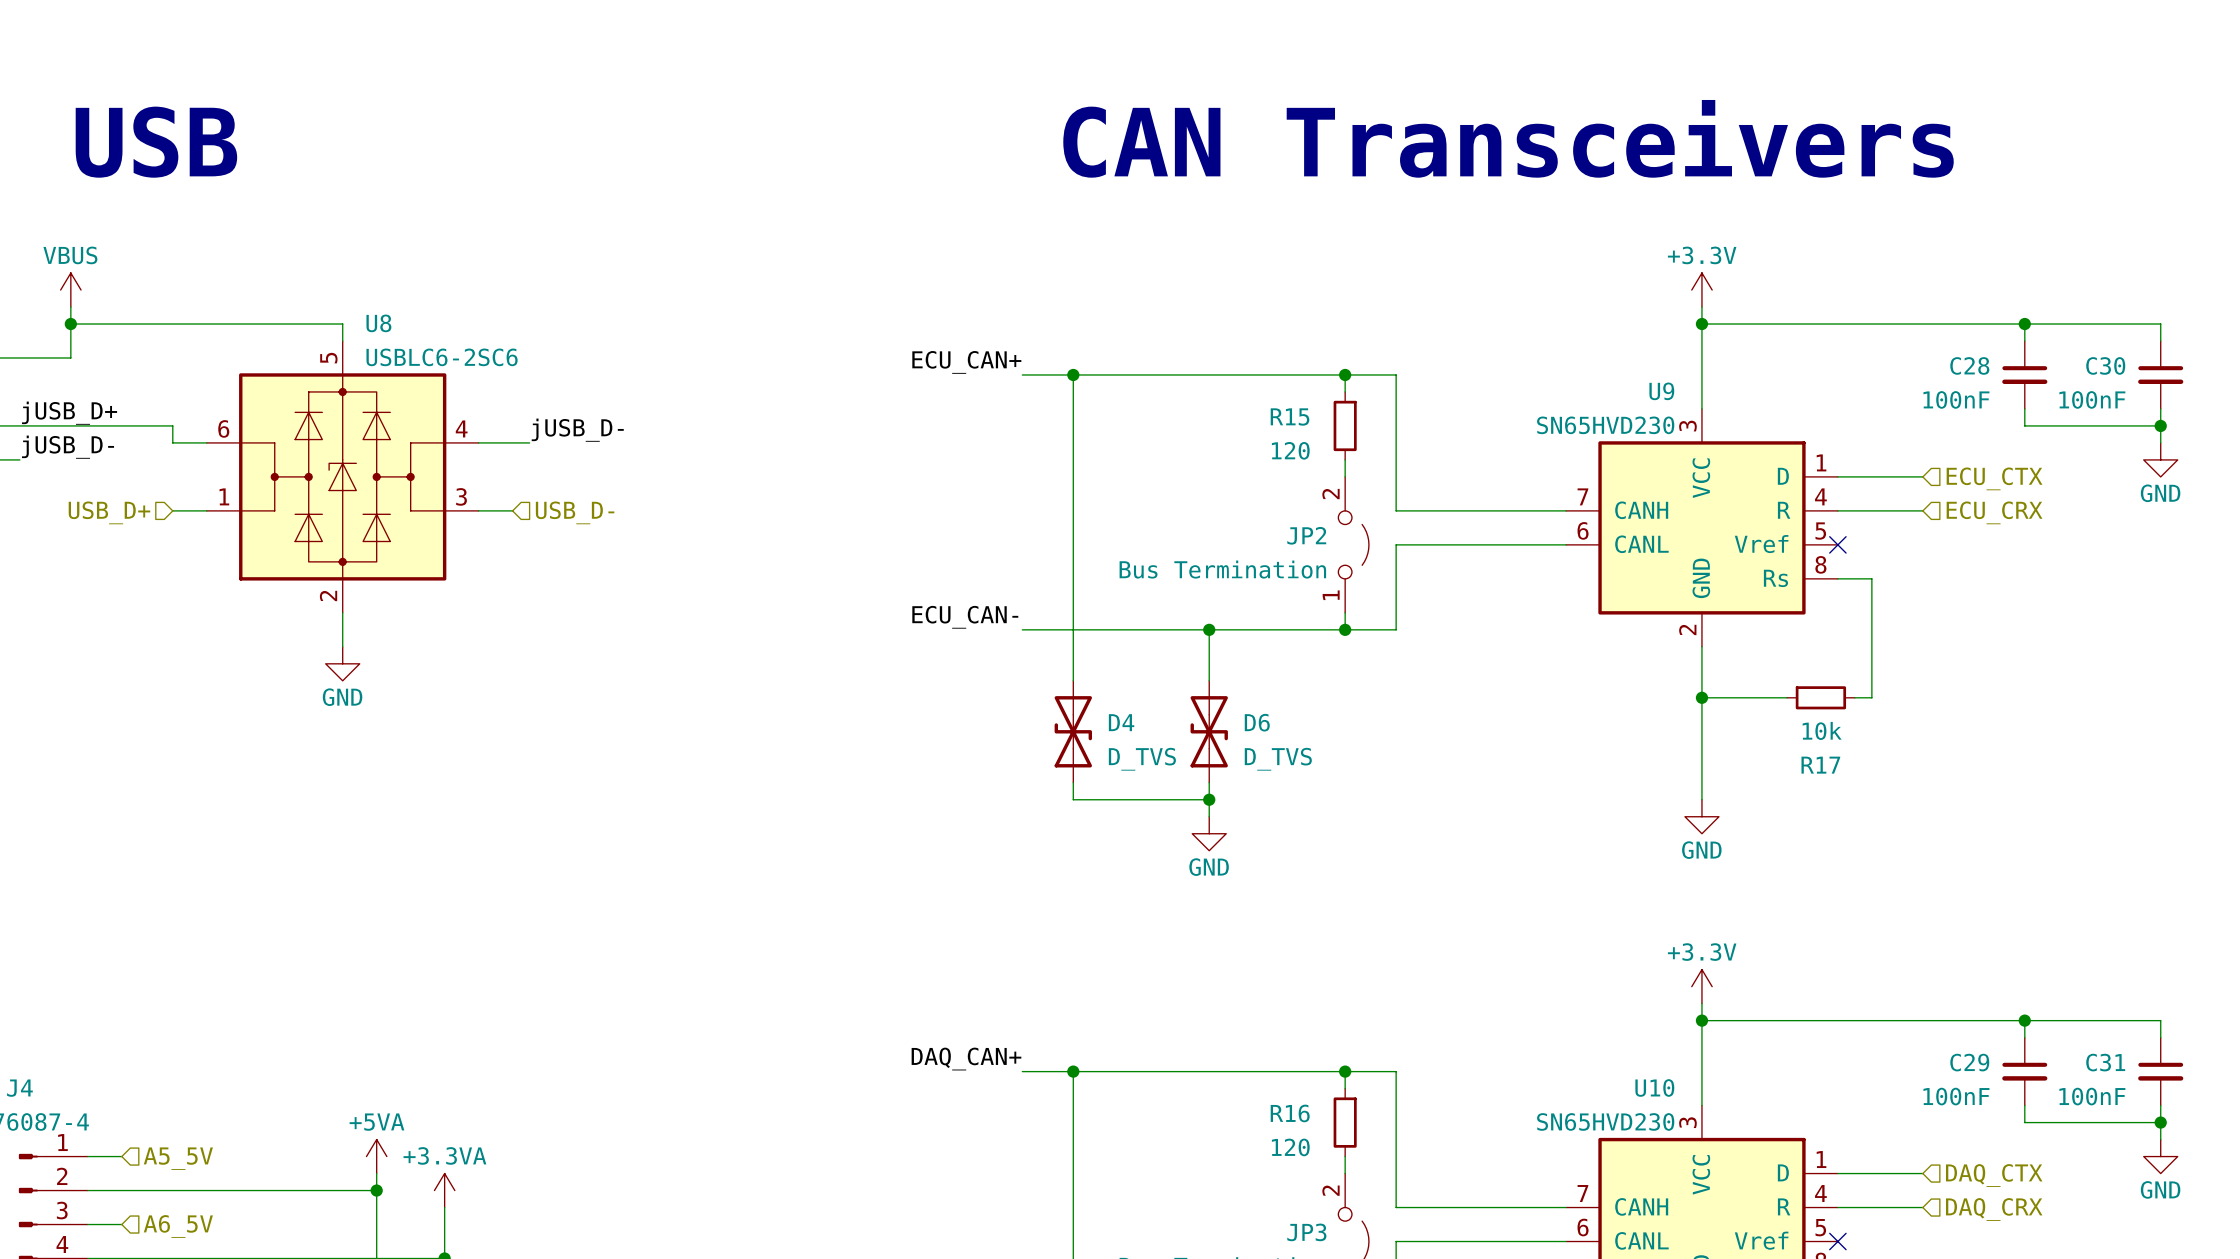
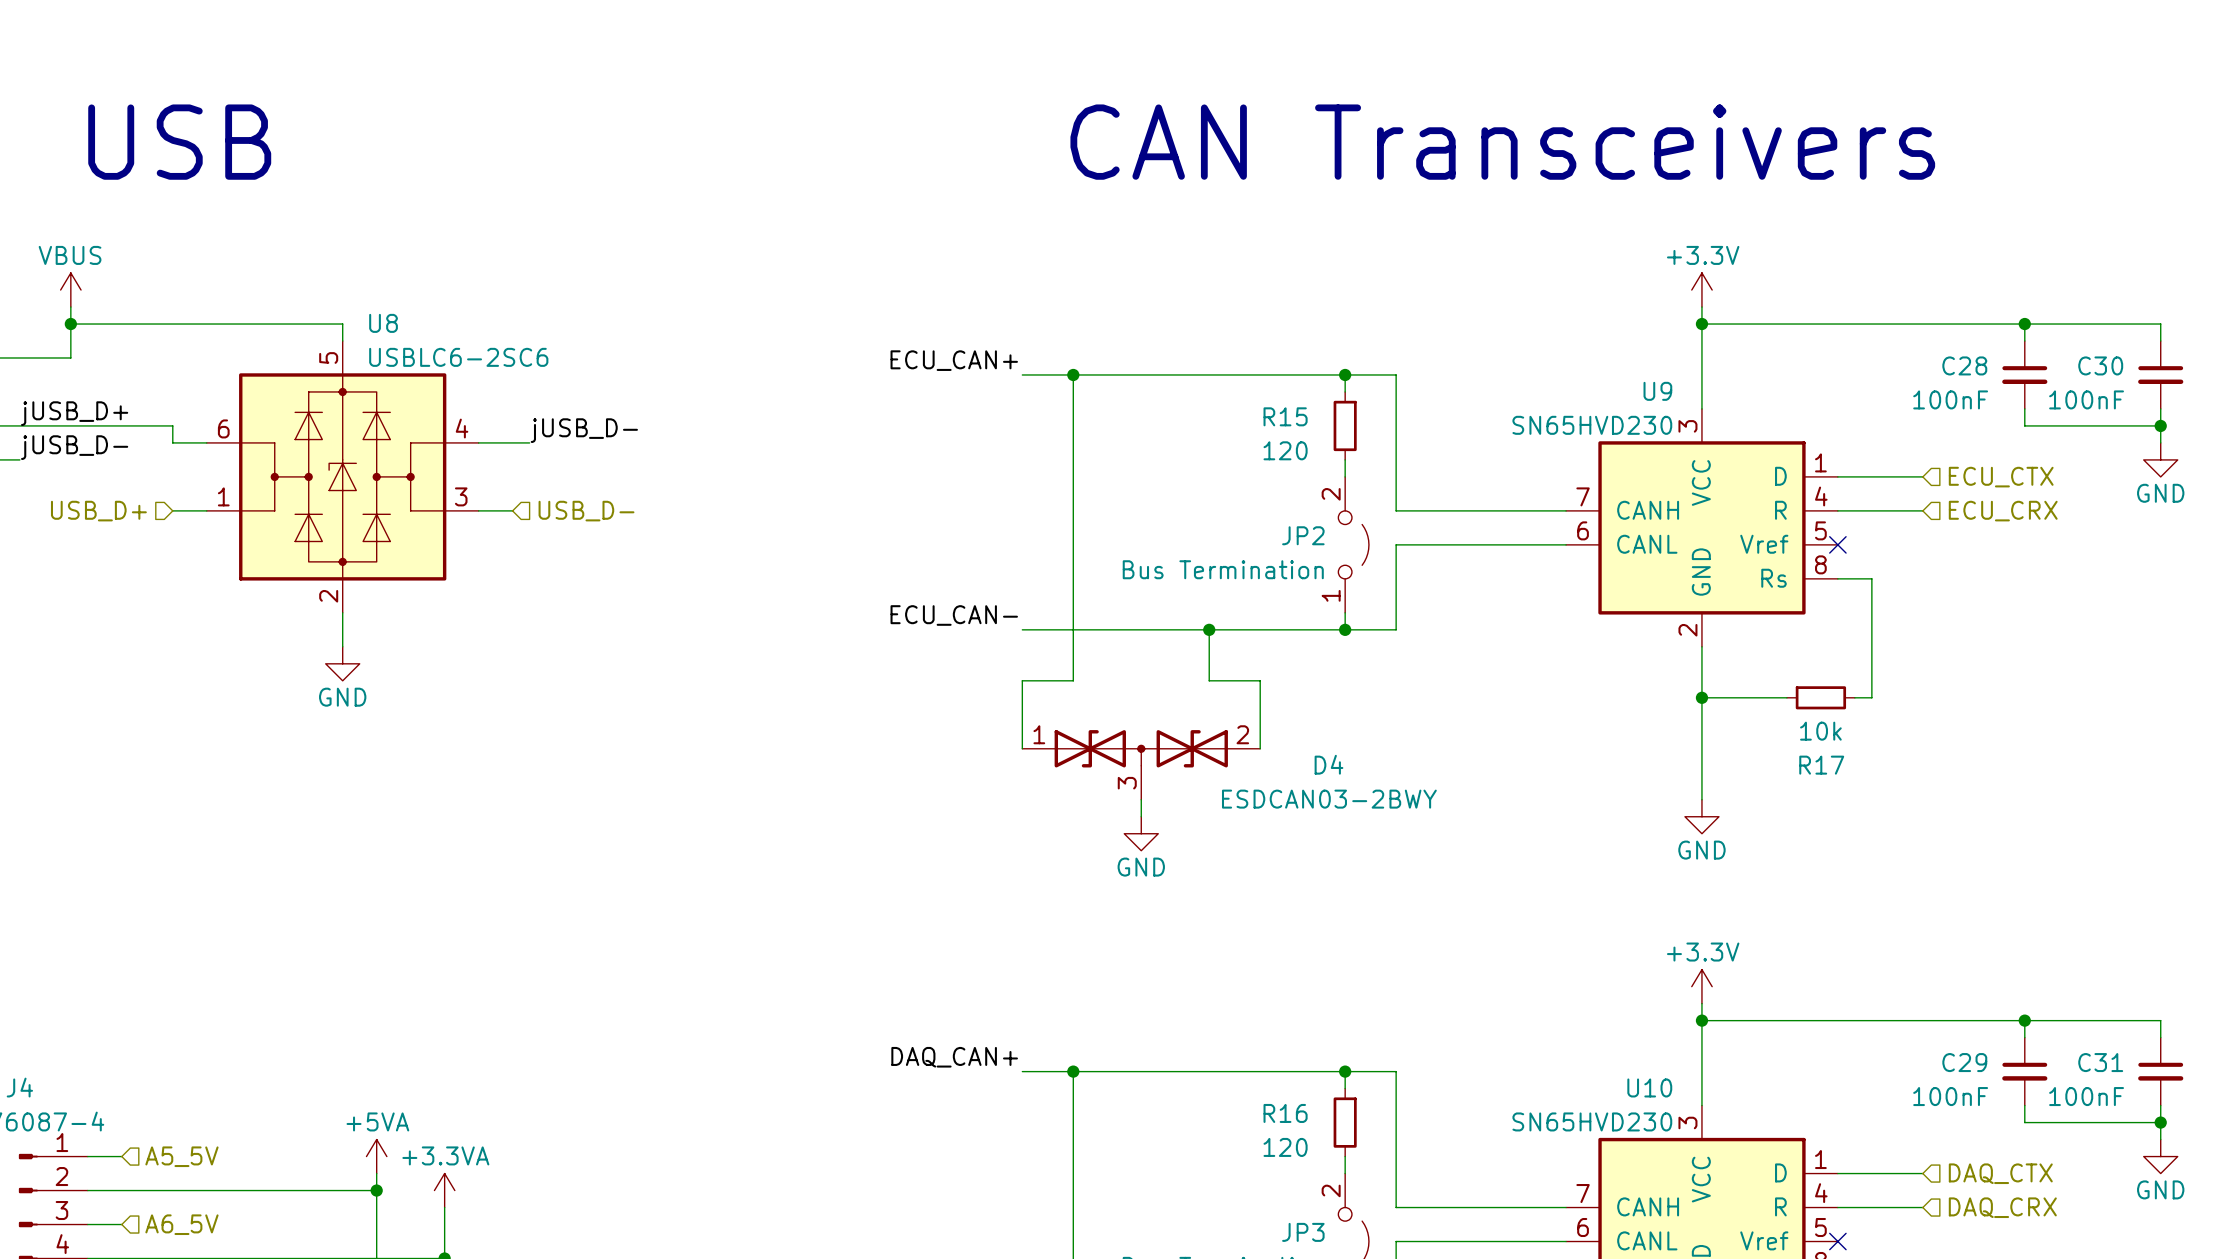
D4 symbol: [1054, 680, 1092, 783] -> [1022, 730, 1261, 800]
wire: none -> (1073, 680) (1022, 680) (1022, 748)
wire: none -> (1209, 680) (1260, 680) (1260, 748)
D4 name position: D4 (1121, 722) -> D4 (1328, 764)
D6: D_TVS (1209, 731) -> none
D4 value: D_TVS (1142, 759) -> ESDCAN03-2BWY (1329, 799)
wire: (1073, 782) (1073, 799) (1209, 799) -> none
wire: (1209, 782) (1209, 816) -> none
wire: none -> (1141, 799) (1141, 816)
junction: (1209, 799) -> none
power symbol position: GND (1209, 833) -> GND (1141, 833)

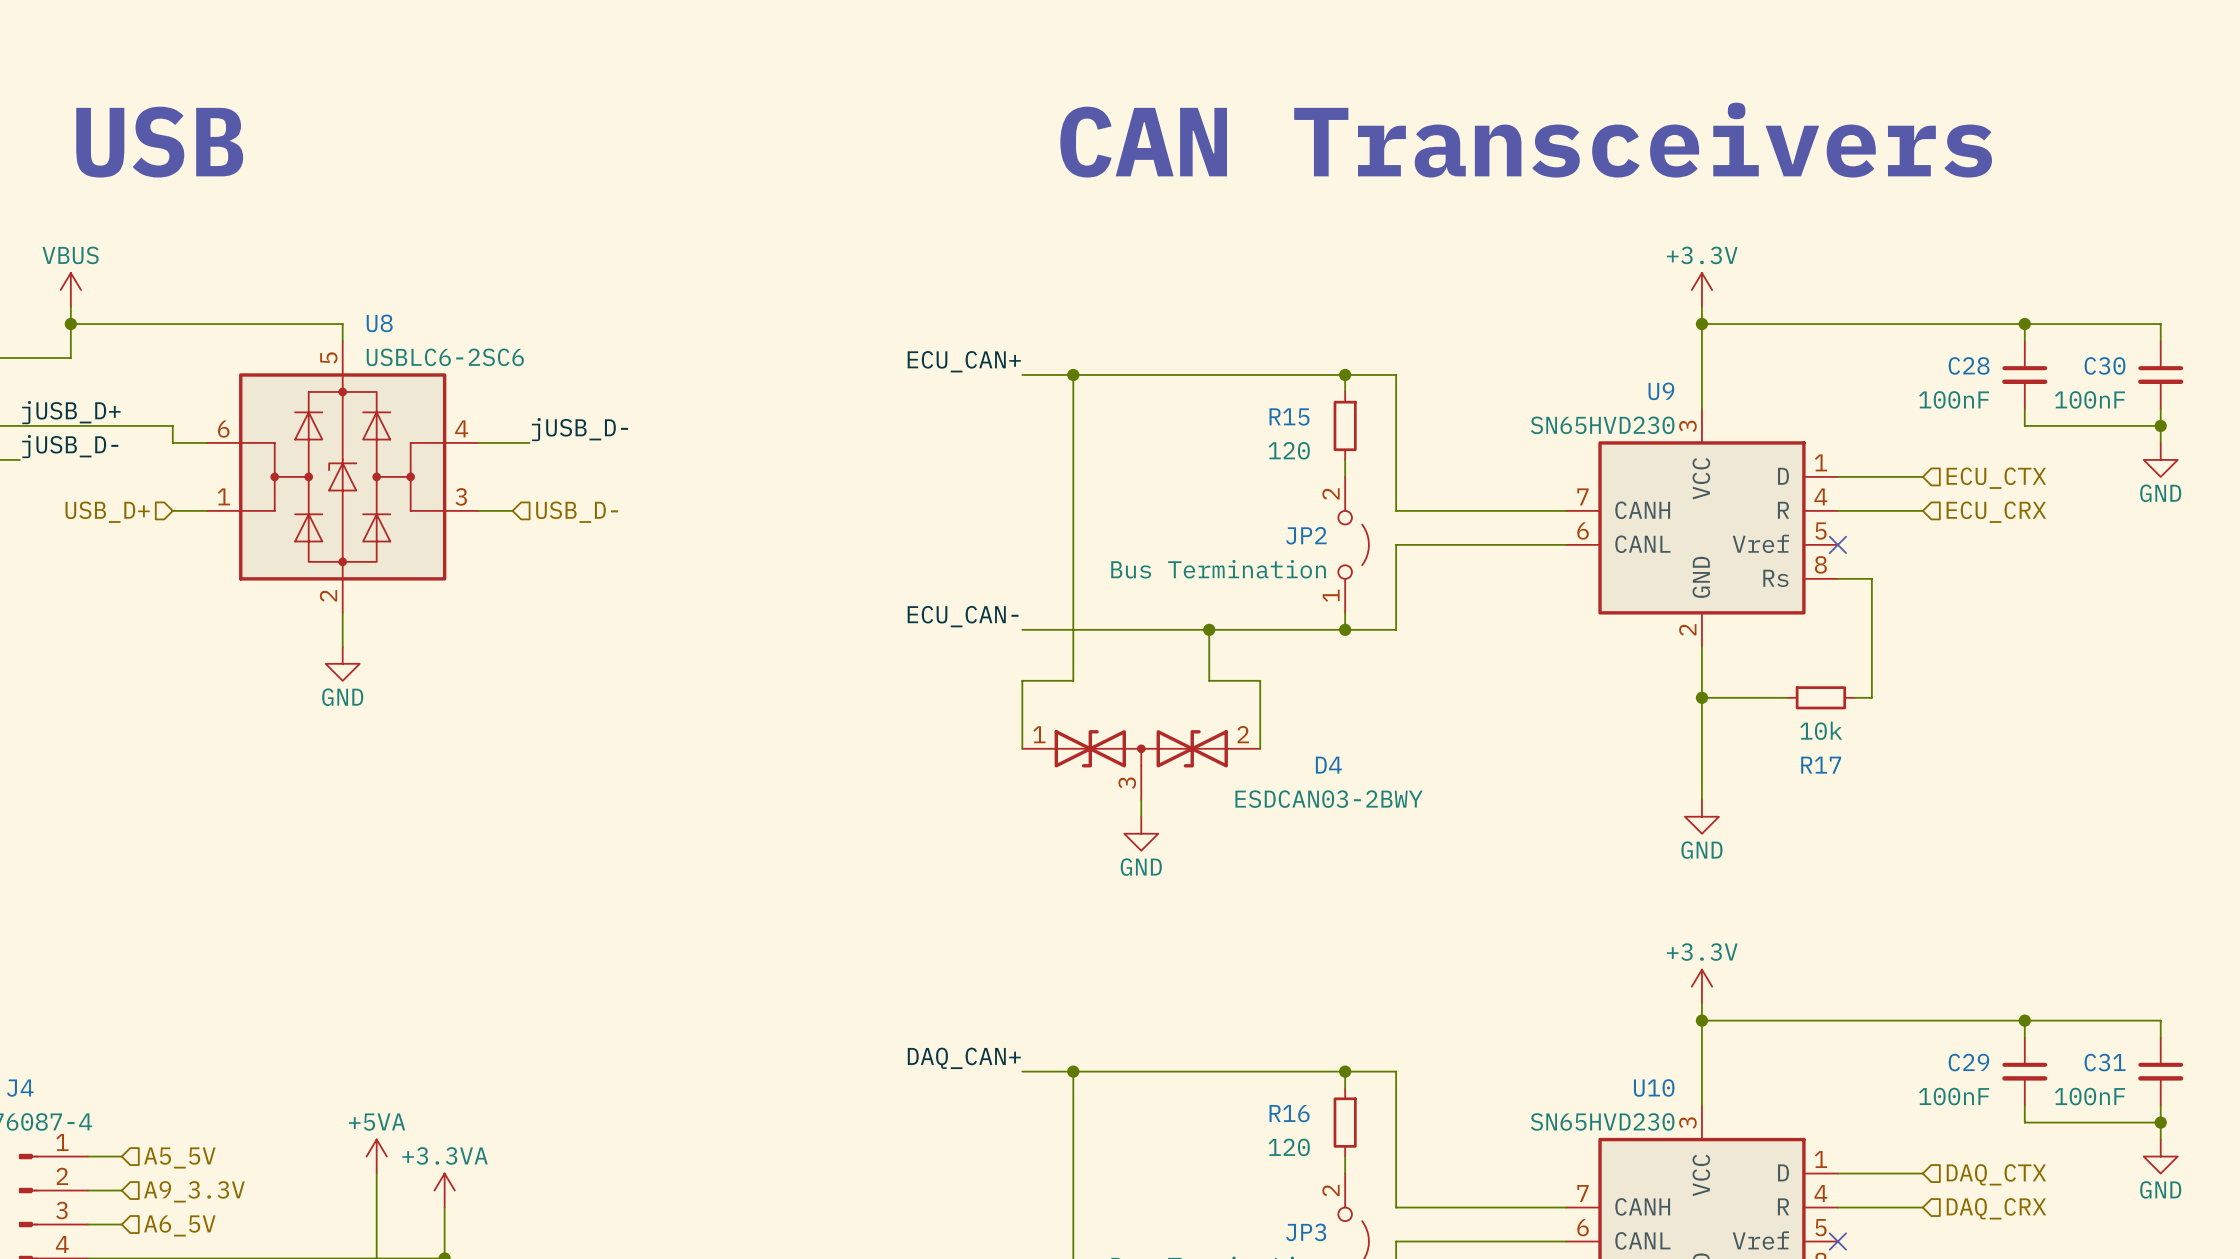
wire: (121, 1190) (376, 1190) -> none
hierarchical label: none -> A9_3.3V (194, 1191)
junction: (376, 1190) -> none

